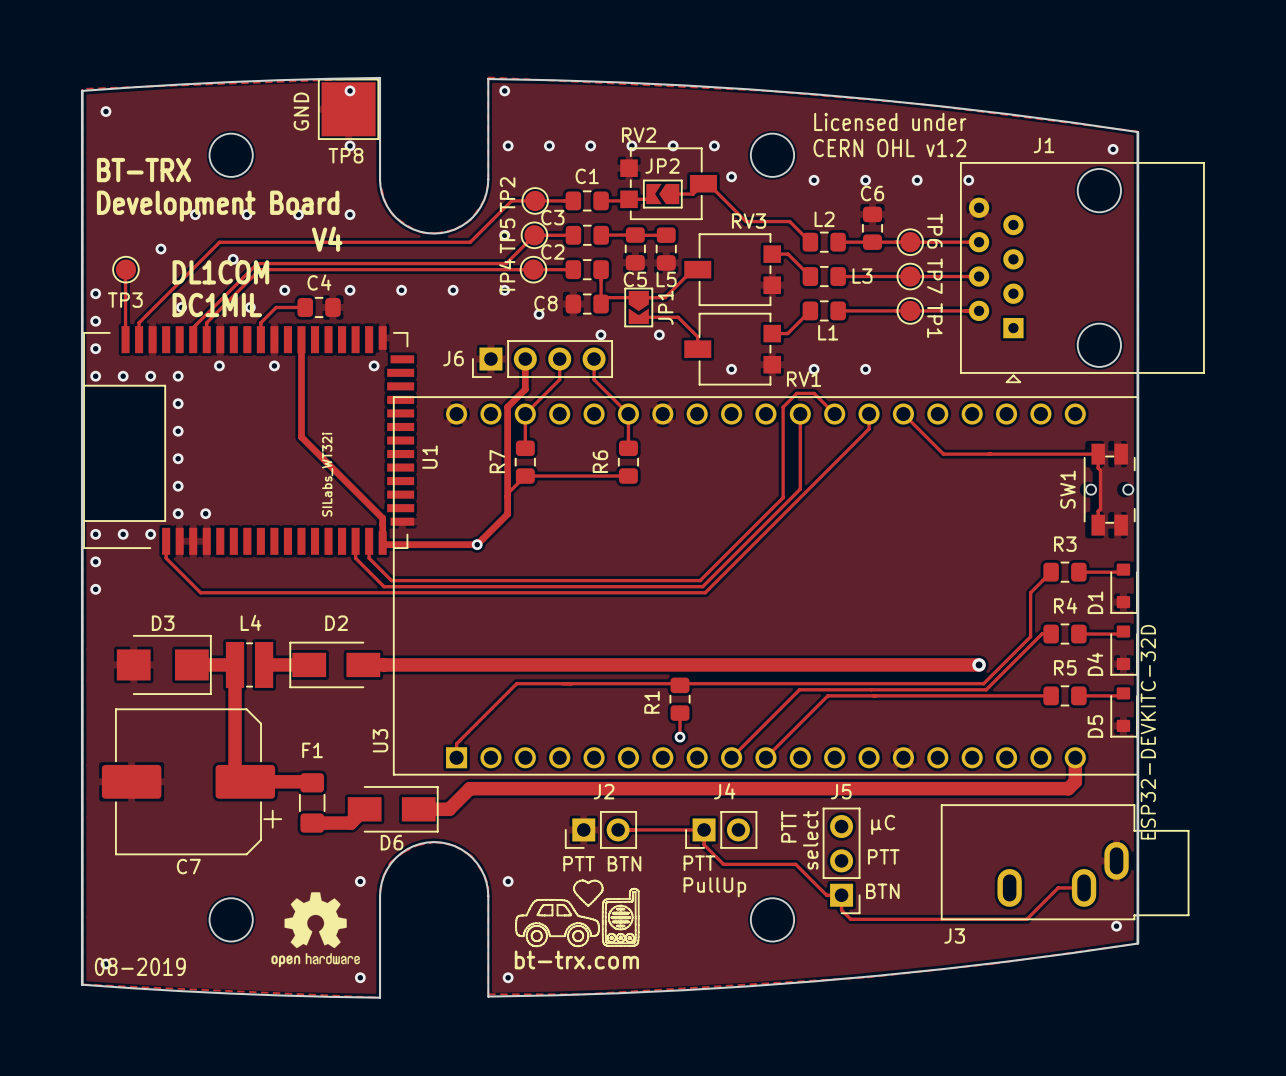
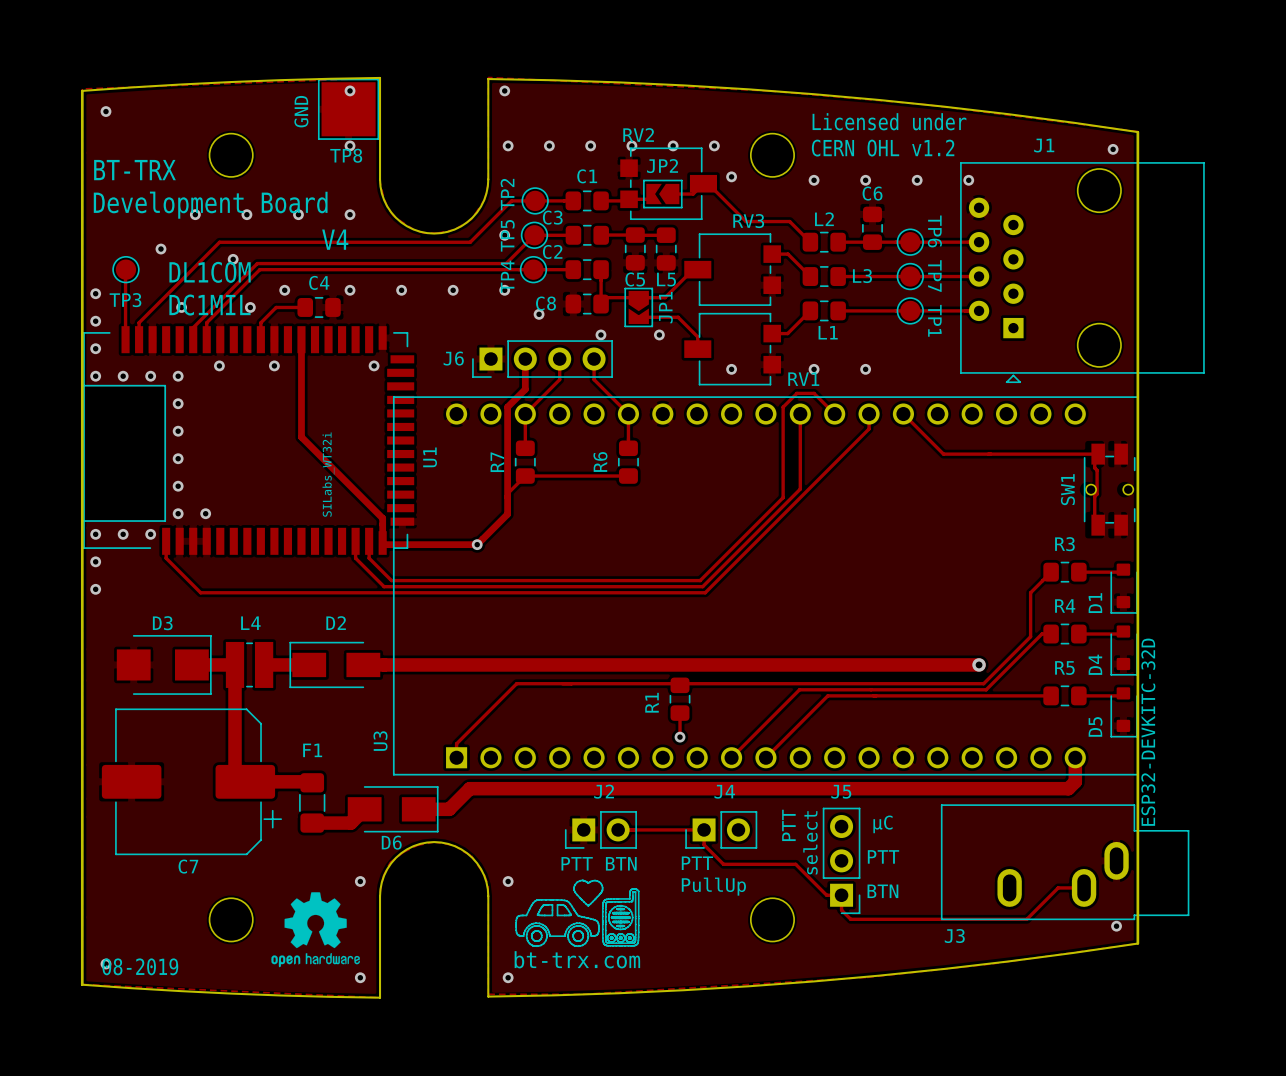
track: none -> (1094, 454) (1094, 468) (1097, 470) (1094, 525)
track: (1098, 454) (1098, 468) (1100, 470) (1100, 508) (1098, 511) (1098, 525) -> none

